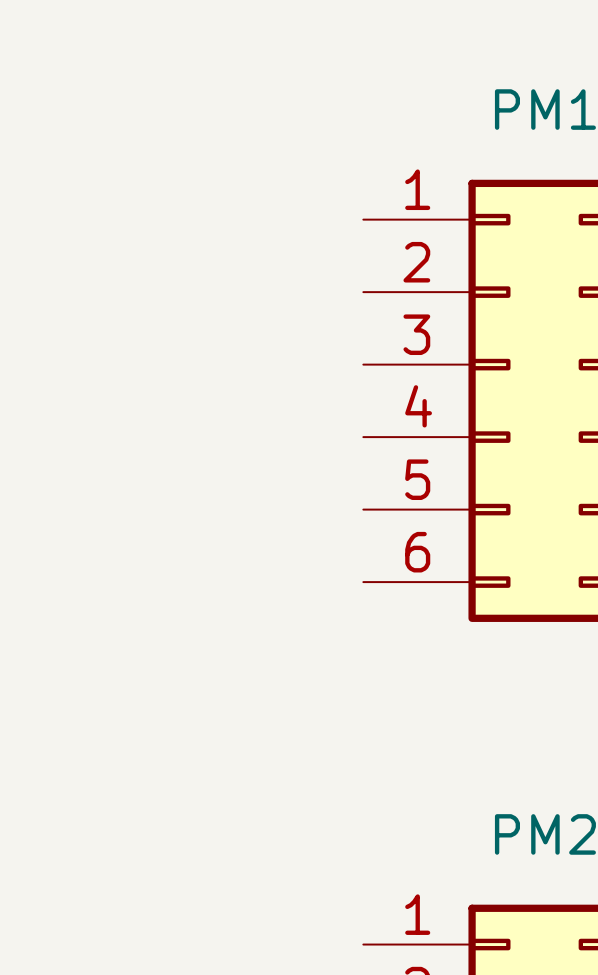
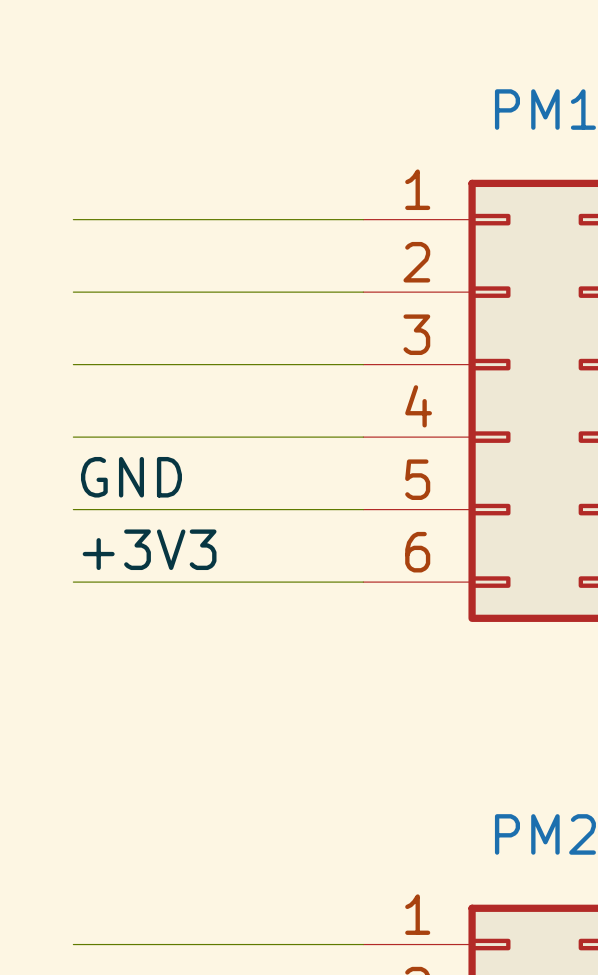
wire: none -> (73, 219) (363, 219)
wire: none -> (73, 292) (363, 292)
wire: none -> (73, 364) (363, 364)
wire: none -> (73, 437) (363, 437)
label: none -> GND (131, 477)
wire: none -> (73, 509) (363, 509)
label: none -> +3V3 (149, 549)
wire: none -> (73, 582) (363, 582)
wire: none -> (73, 944) (363, 944)

